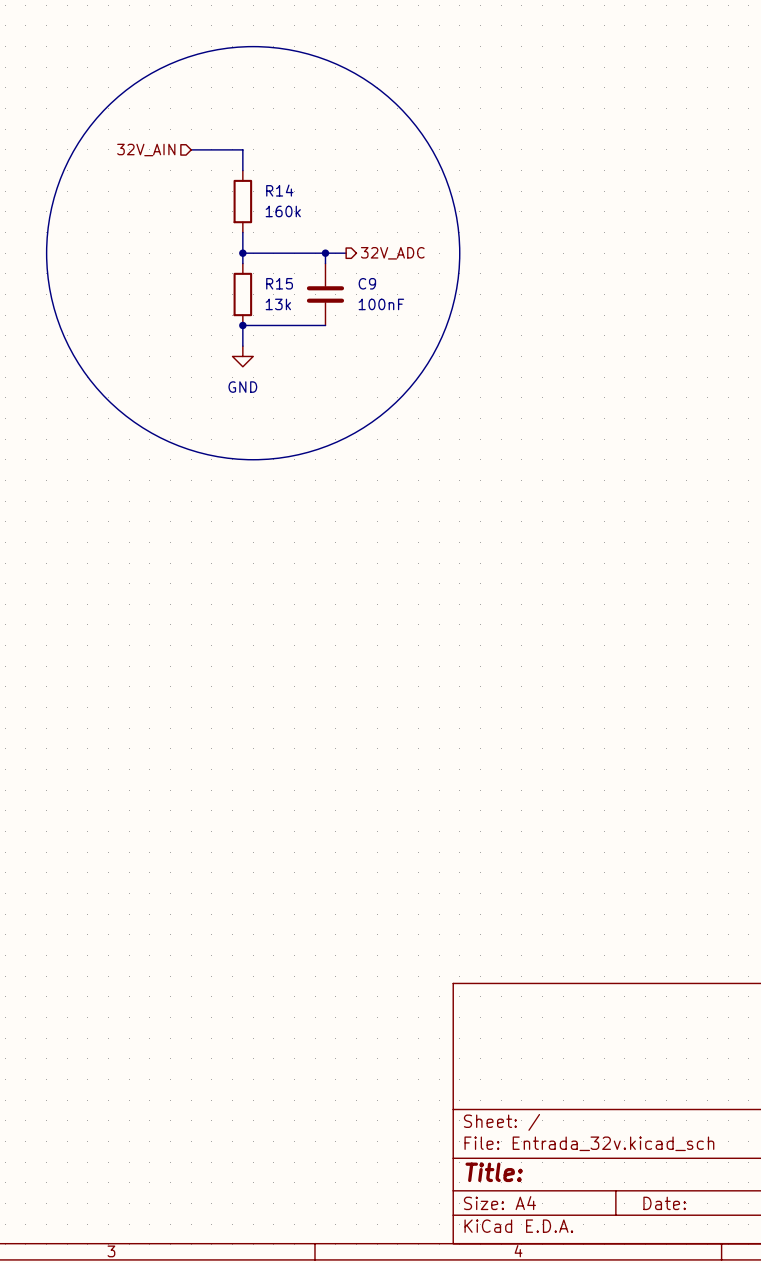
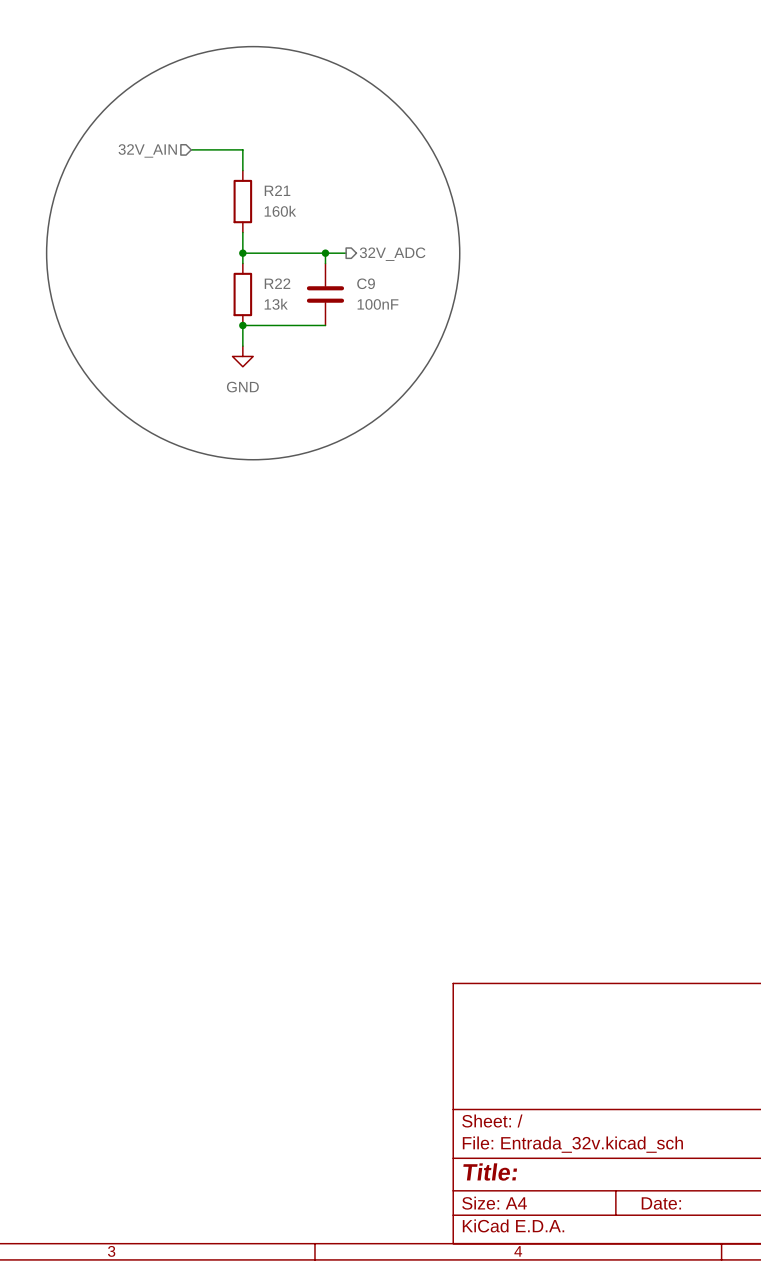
R14 name: R14 (279, 190) -> R21 (277, 190)
R15 name: R15 (279, 283) -> R22 (277, 283)

